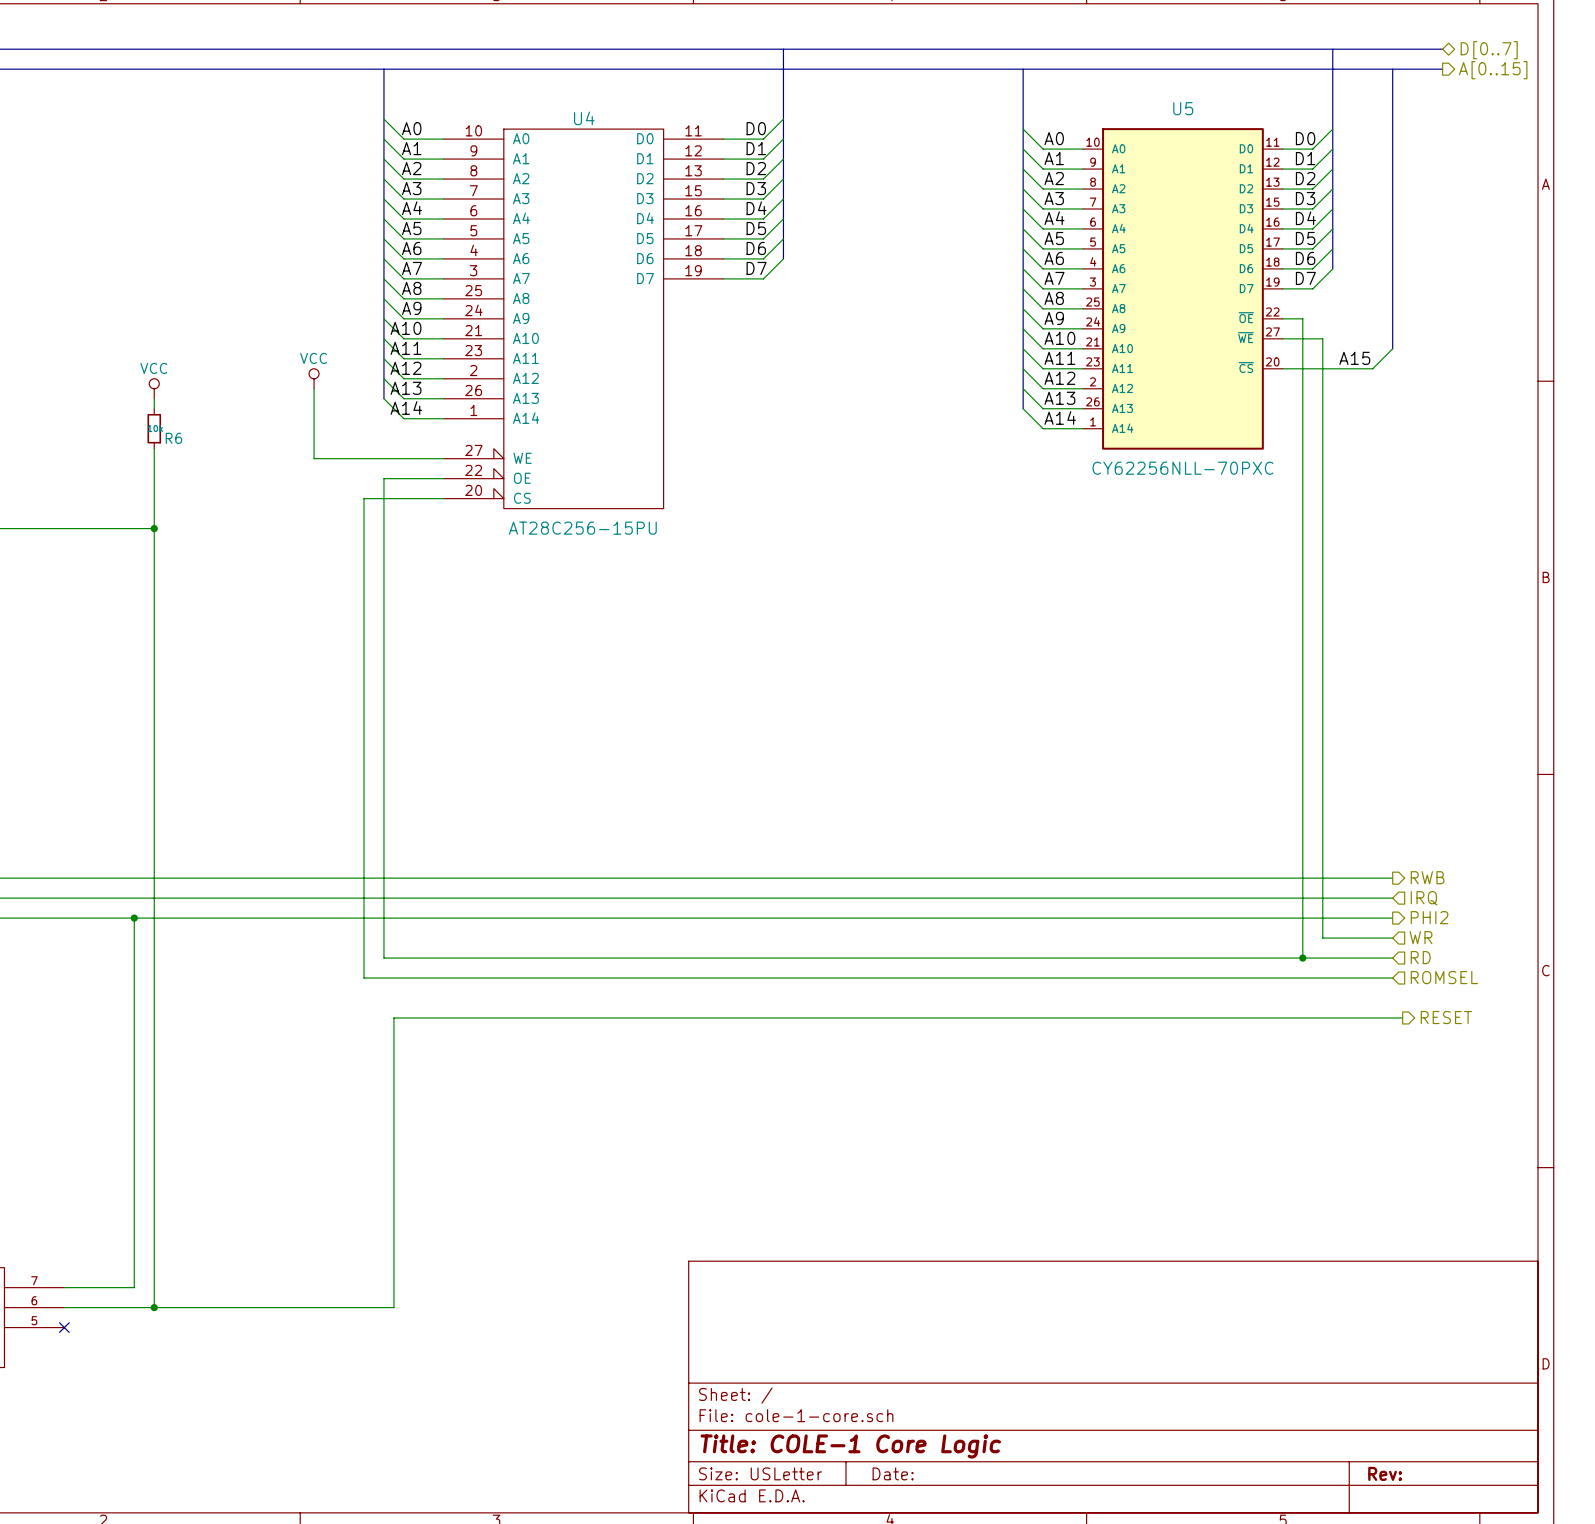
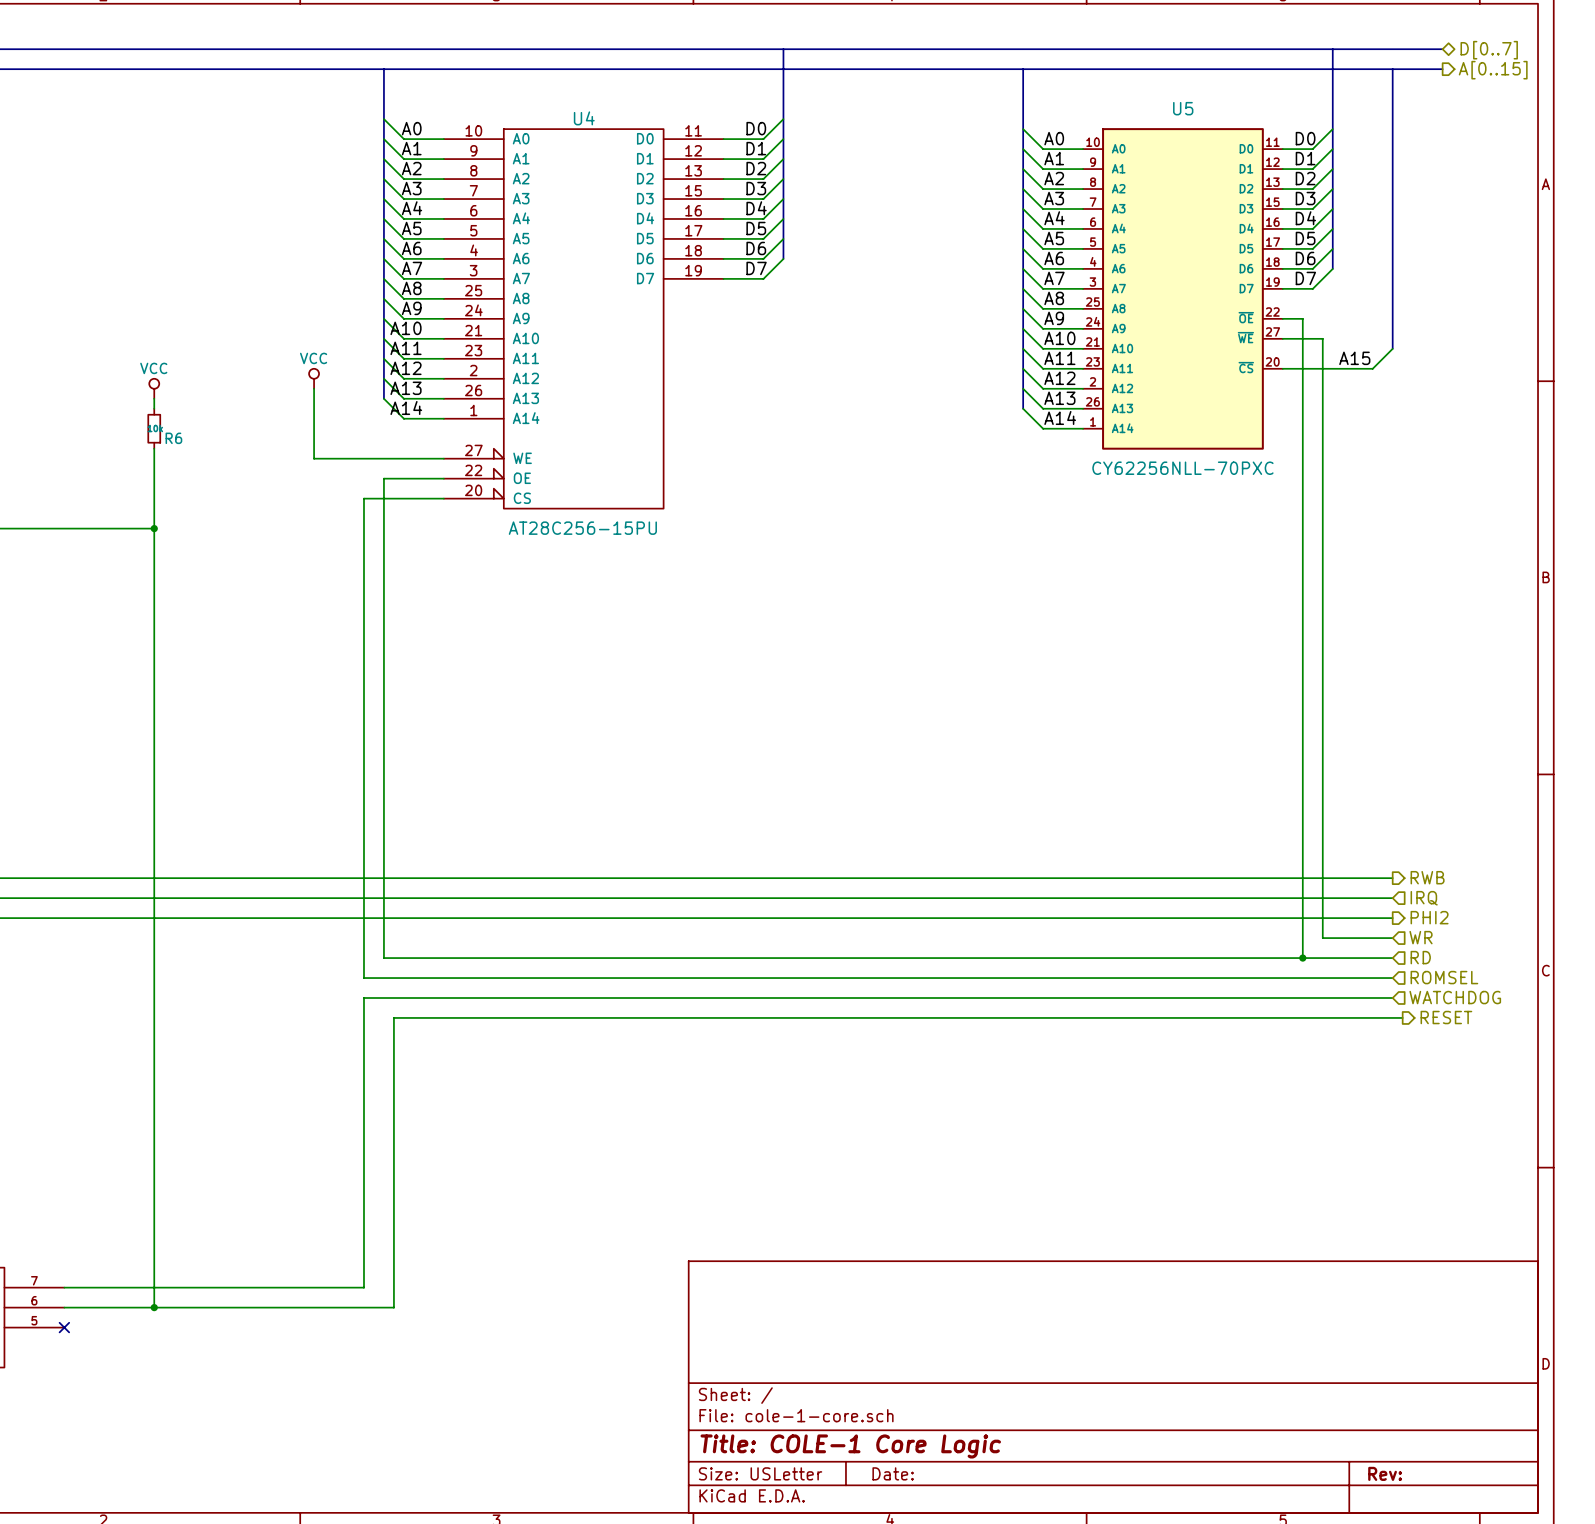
wire: (134, 918) (134, 1287) -> (1392, 998) (363, 998) (363, 1287) (134, 1287)
junction: (134, 918) -> none
hierarchical label: none -> WATCHDOG (1455, 997)

